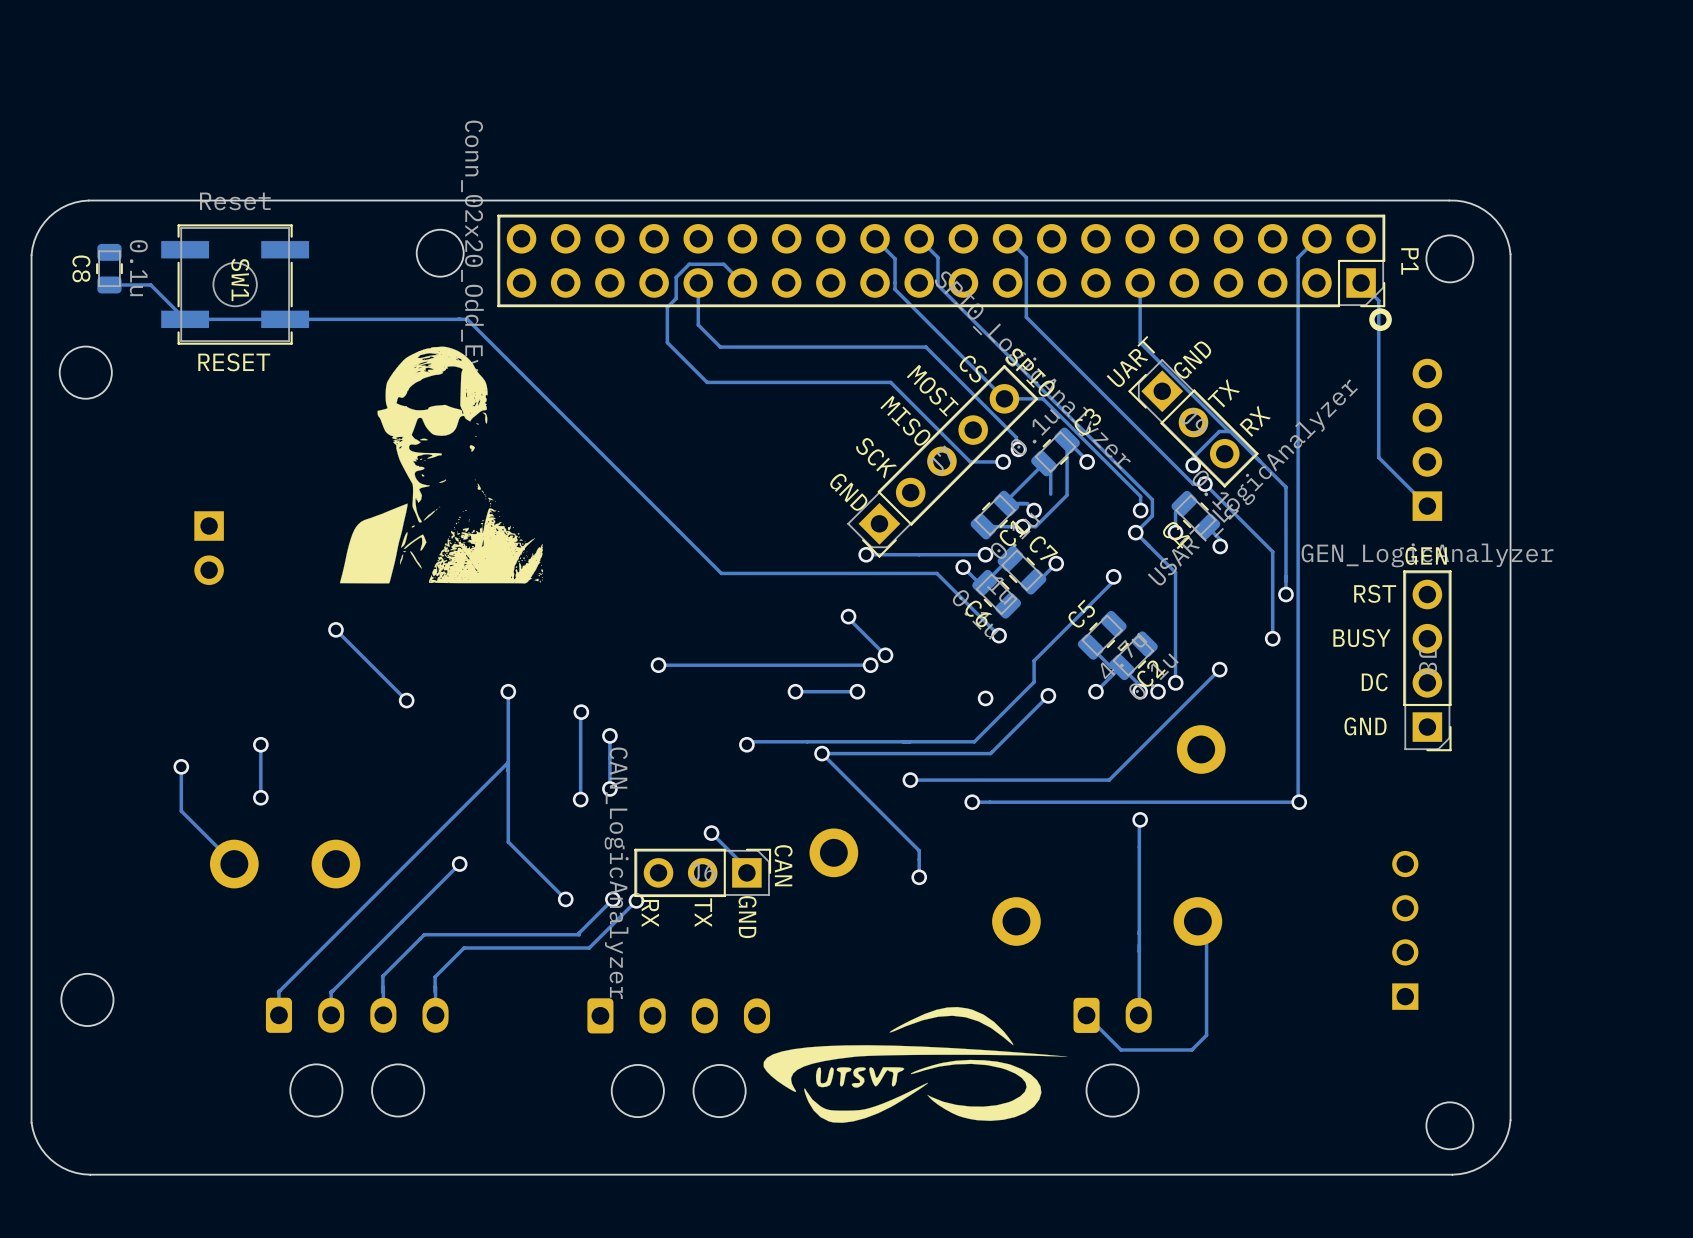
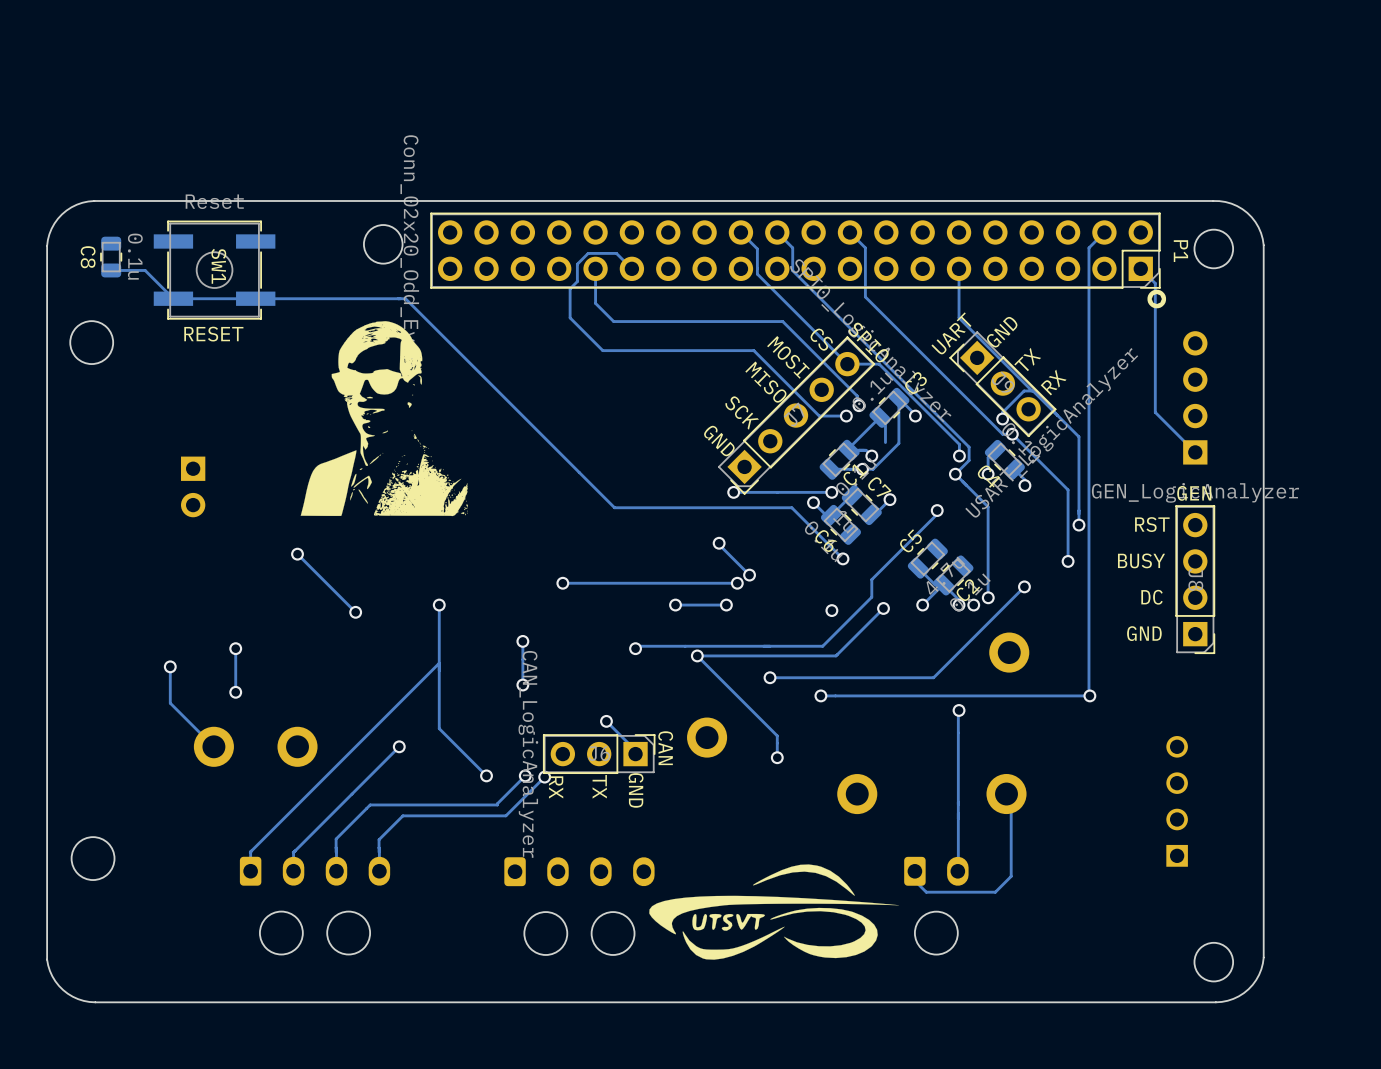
track: (581, 712) (580, 799) -> none
via: (581, 712) -> none
via: (580, 799) -> none
track: (1197, 921) (1206, 930) (1206, 1035) (1191, 1049) (1121, 1049) (1086, 1015) -> none
track: none -> (1011, 794) (1011, 876) (995, 892) (926, 892) (915, 881)

